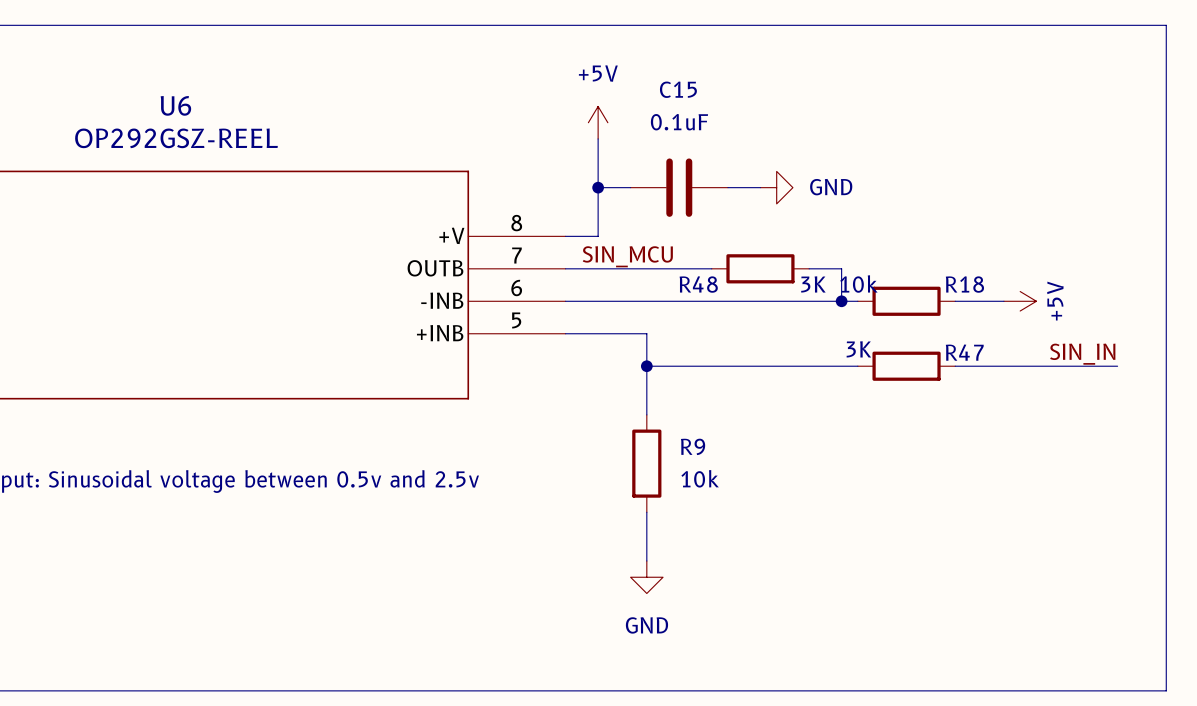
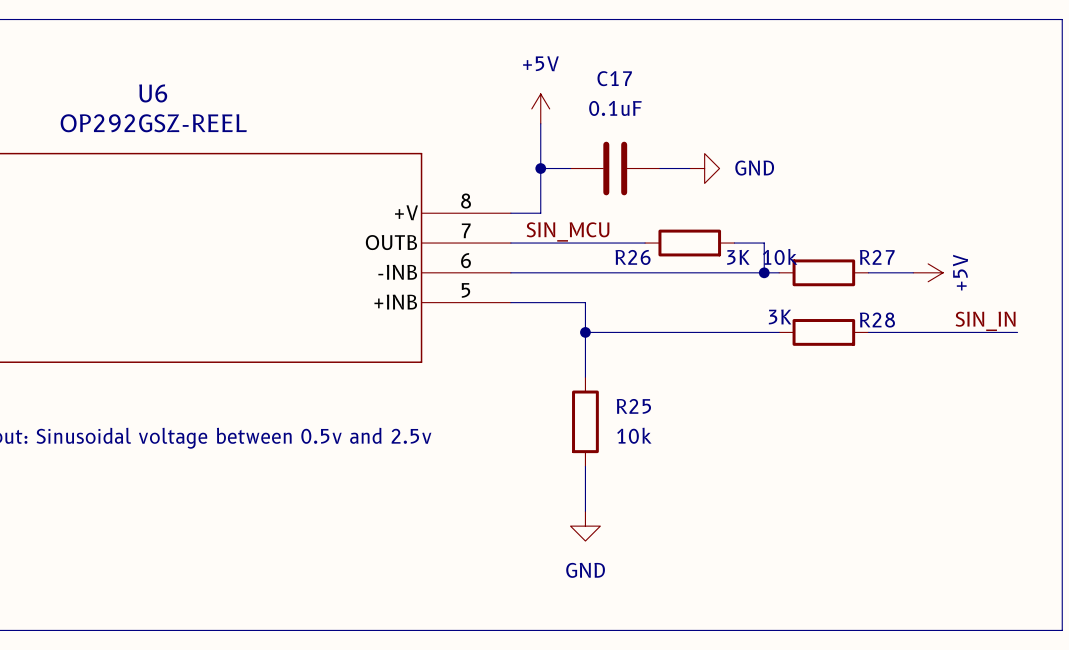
C15 name: C15 (678, 89) -> C17 (614, 78)
R48 name: R48 (698, 284) -> R26 (633, 257)
R18 name: R18 (964, 284) -> R27 (877, 257)
R47 name: R47 (964, 352) -> R28 (877, 320)
R9 name: R9 (693, 446) -> R25 (633, 406)

